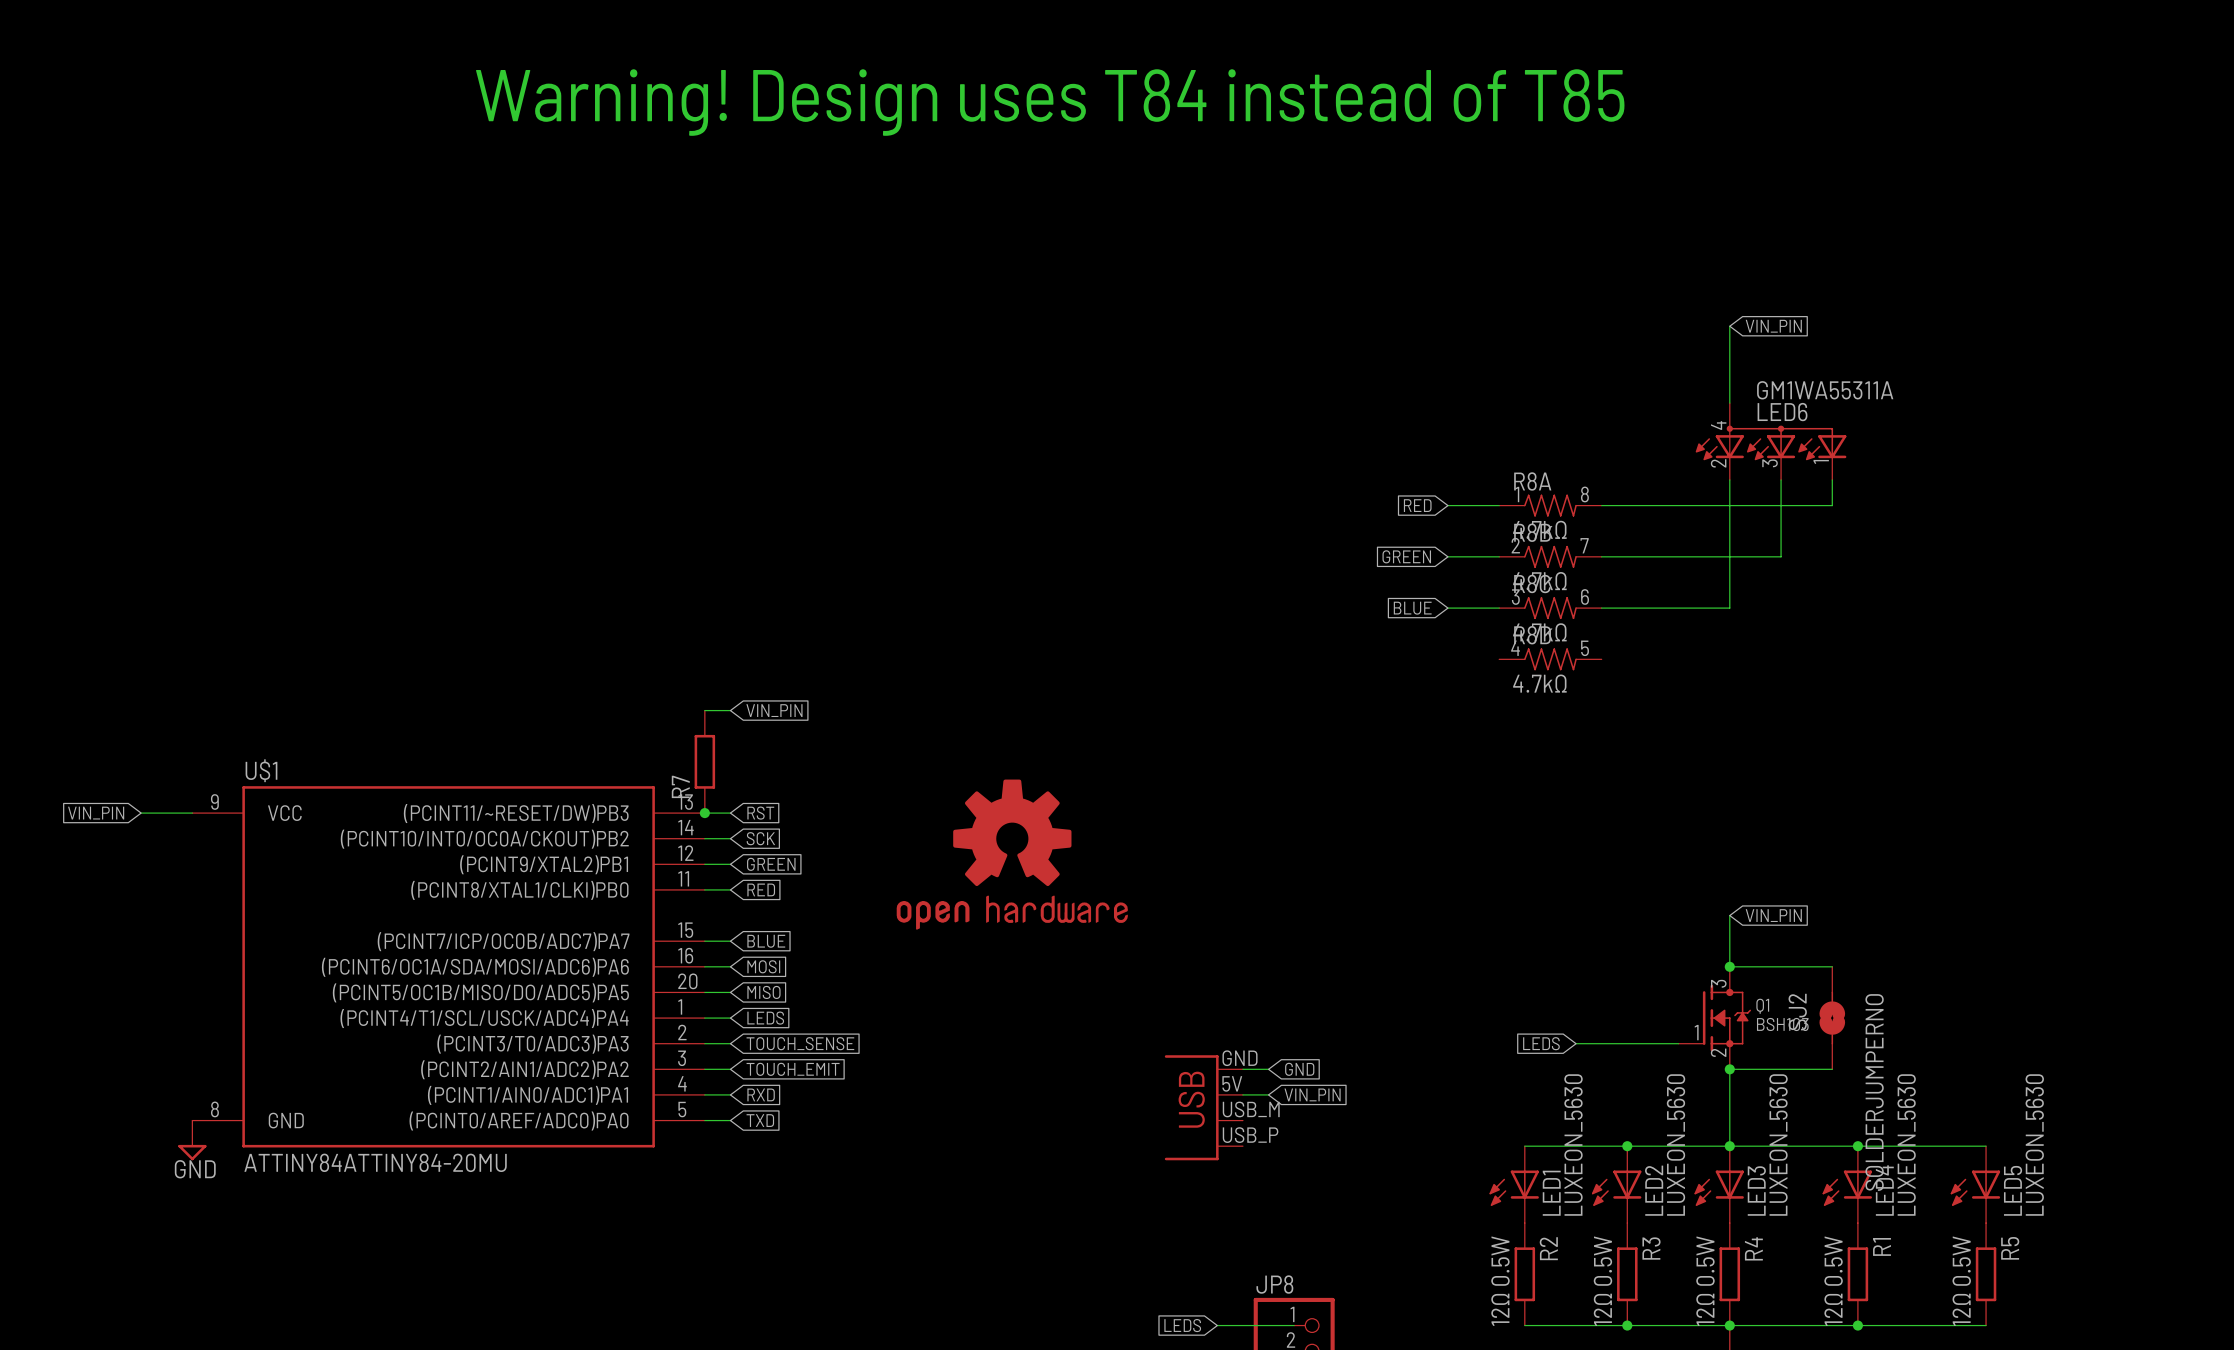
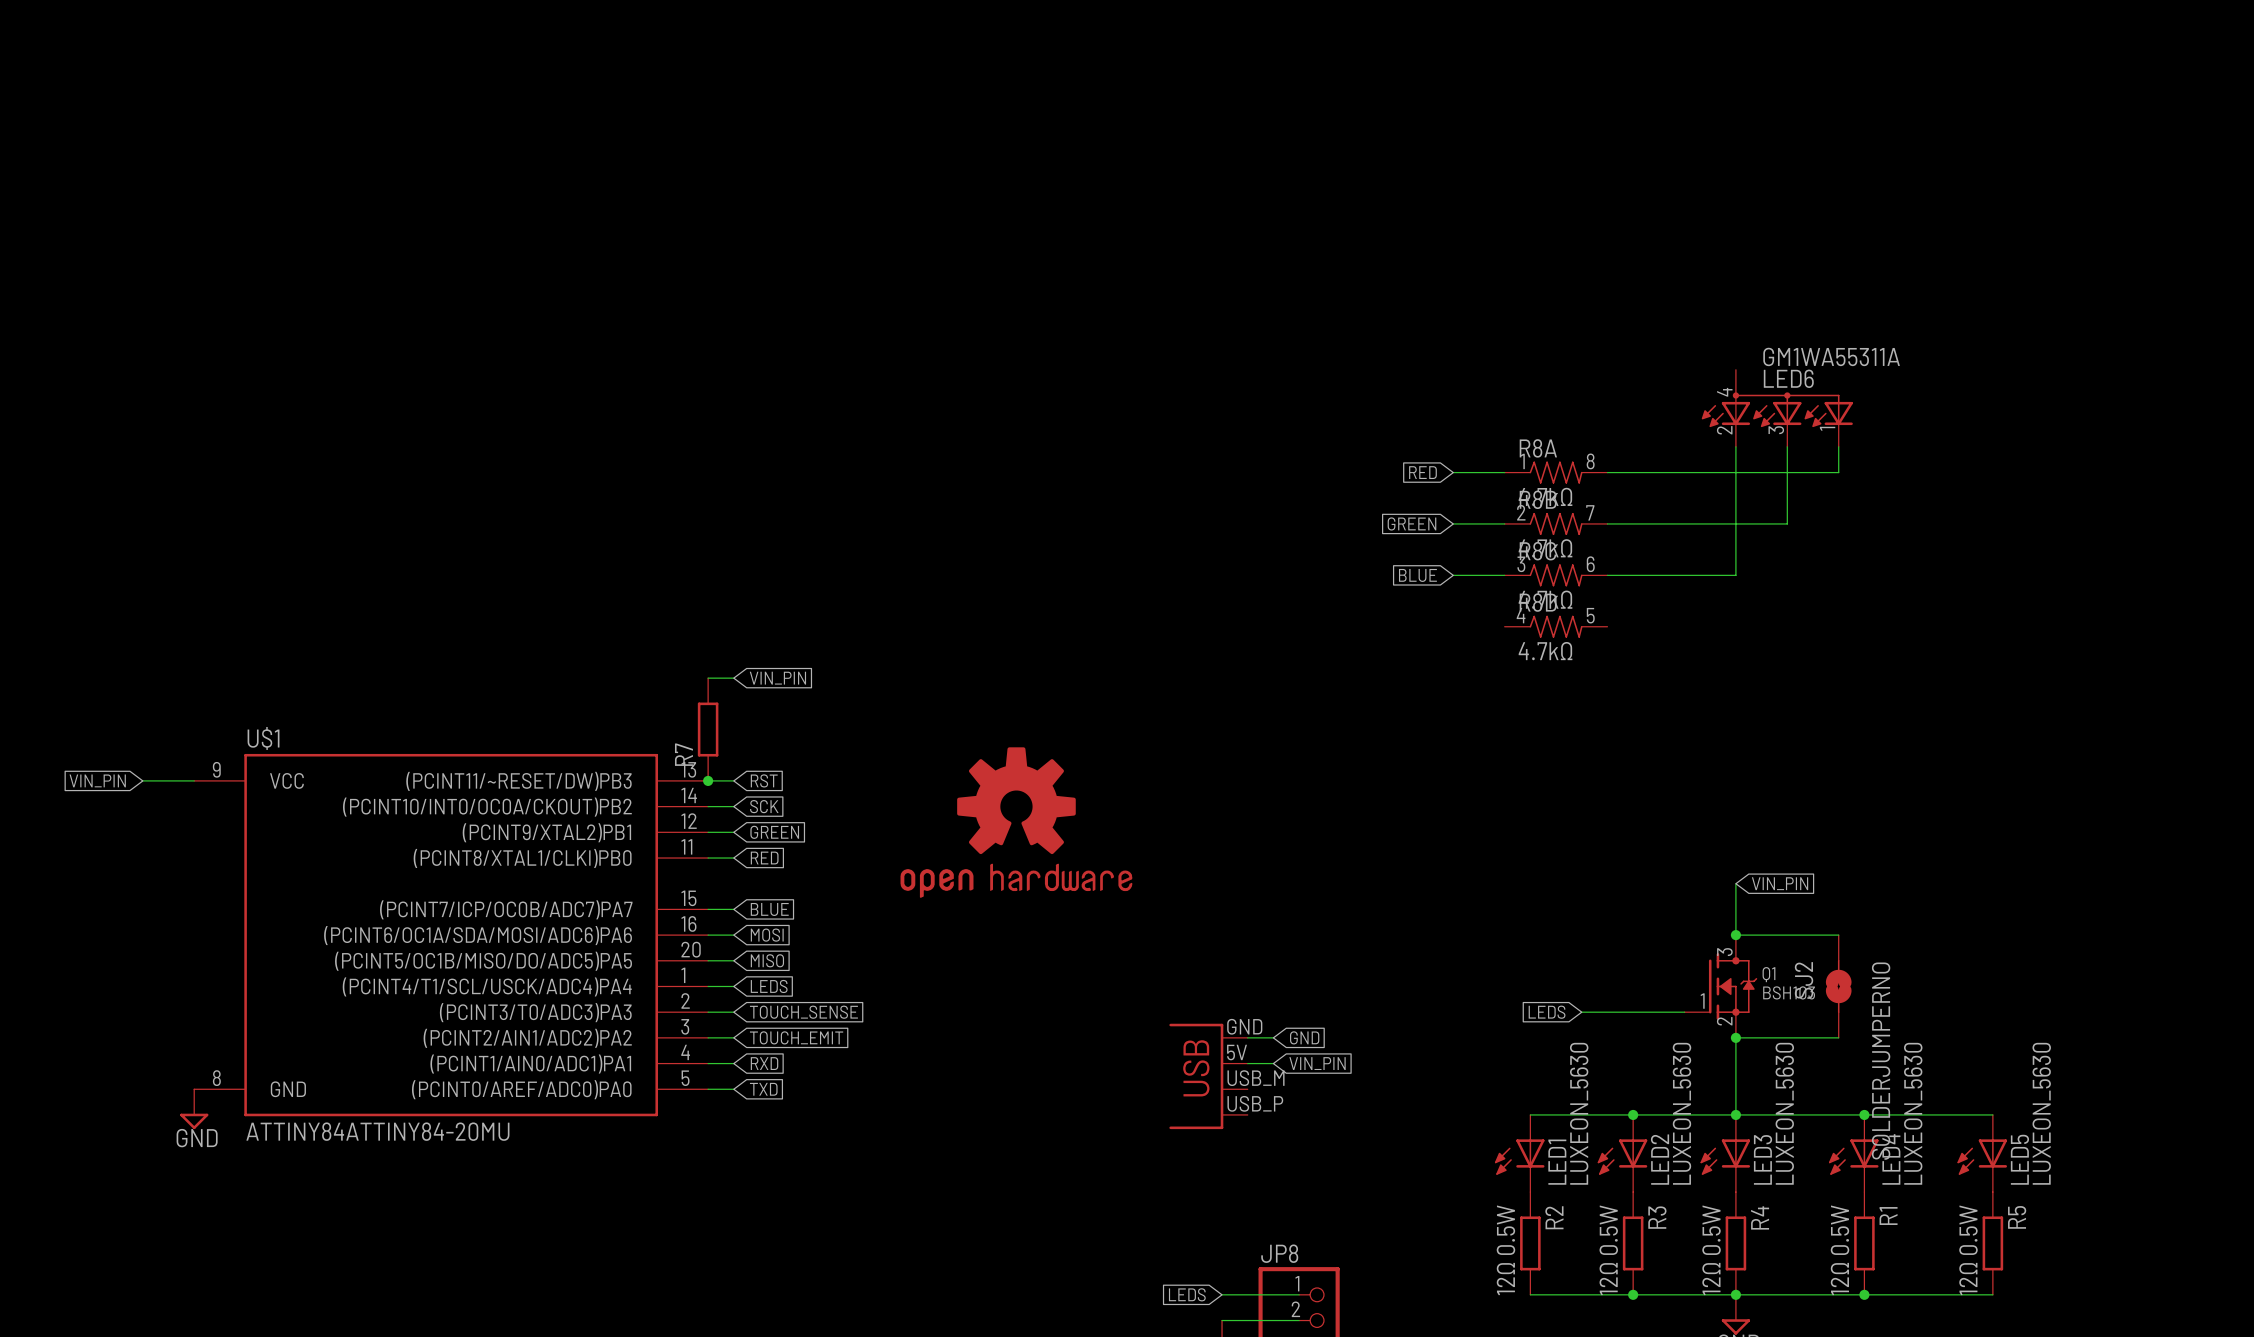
text: Warning! Design uses T84 instead of T85 (1050, 102) -> none
wire: (1729, 326) (1729, 403) -> none
global label: VIN_PIN (1773, 326) -> none

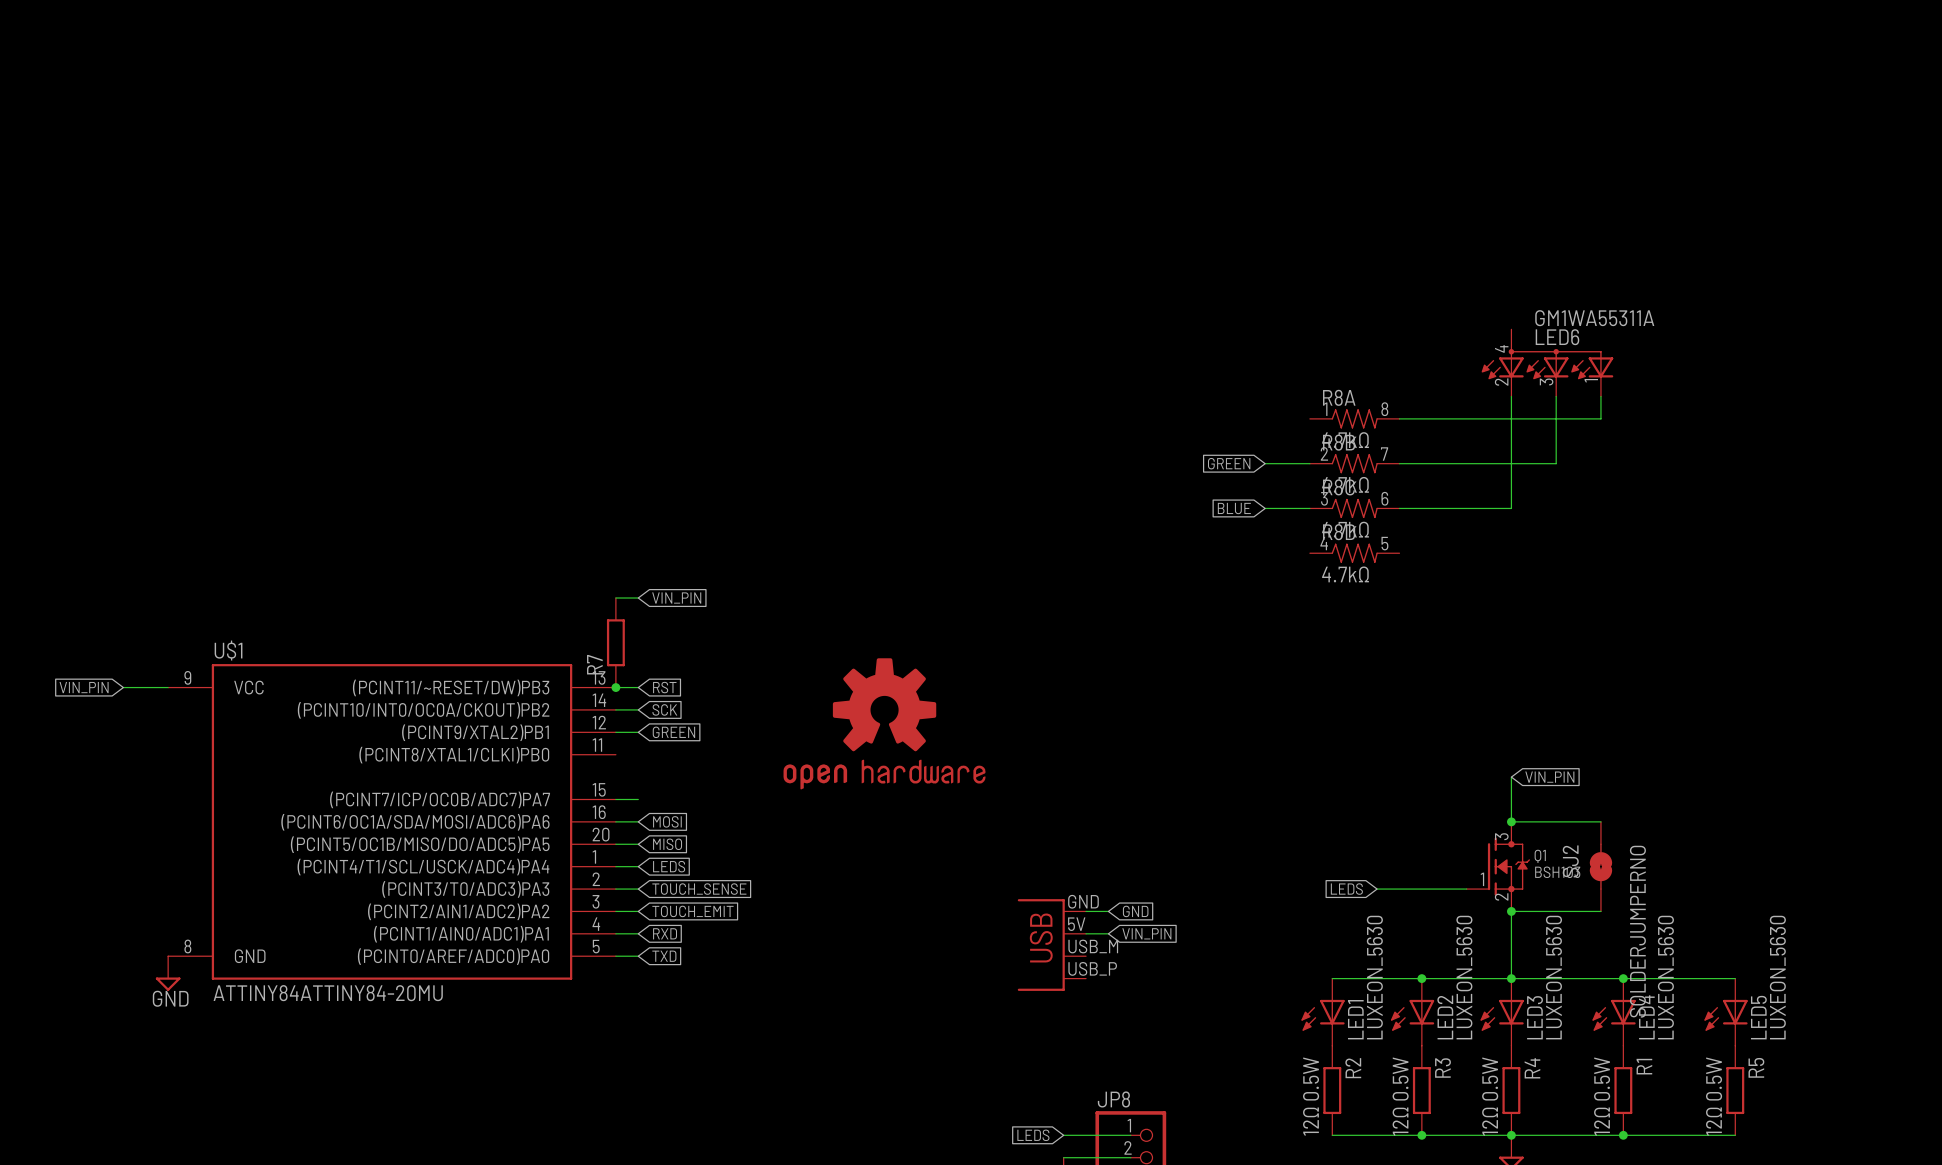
global label: RED (1422, 472) -> none
wire: (1453, 472) (1504, 472) -> none
wire: (708, 858) (733, 858) -> none
global label: RED (764, 858) -> none
global label: BLUE (769, 909) -> none

